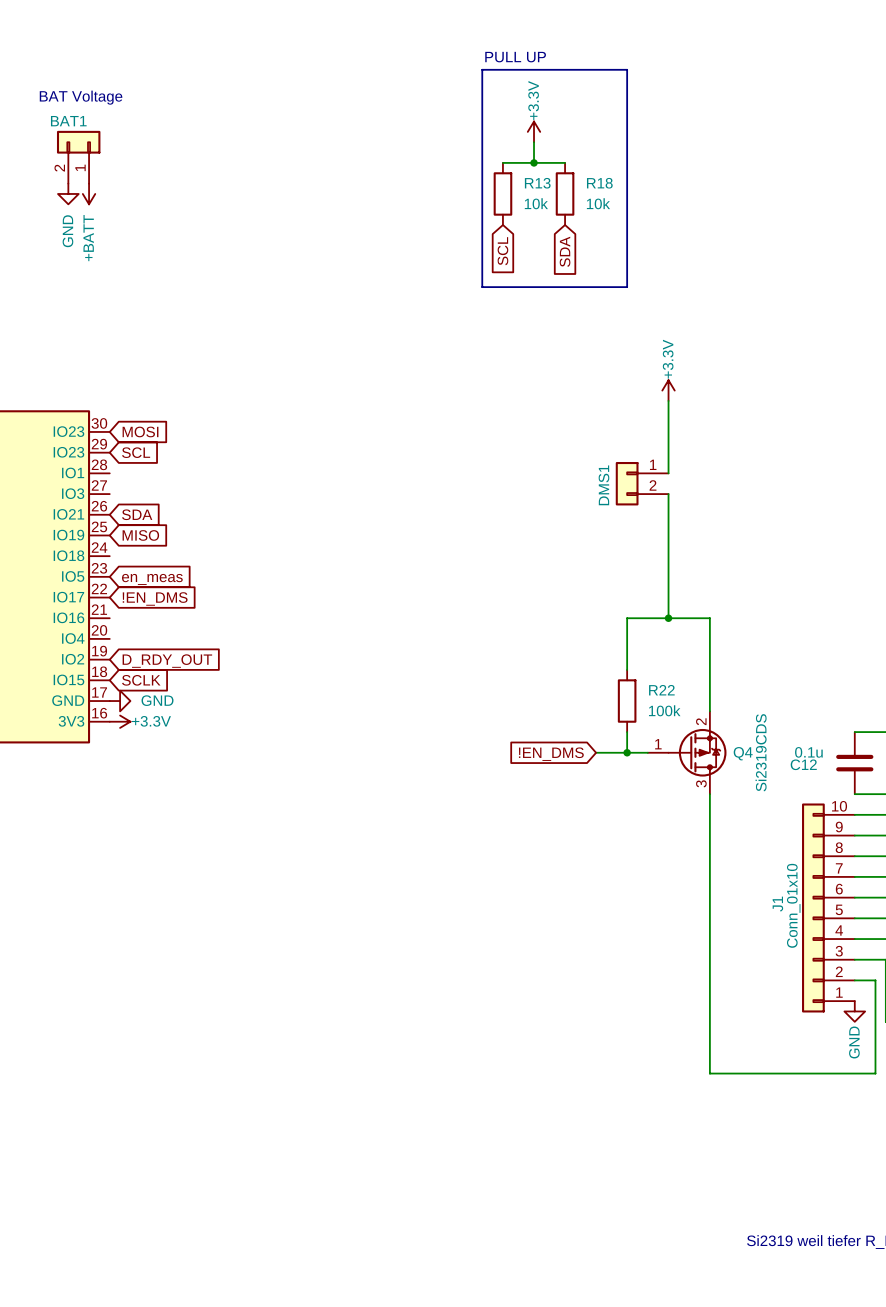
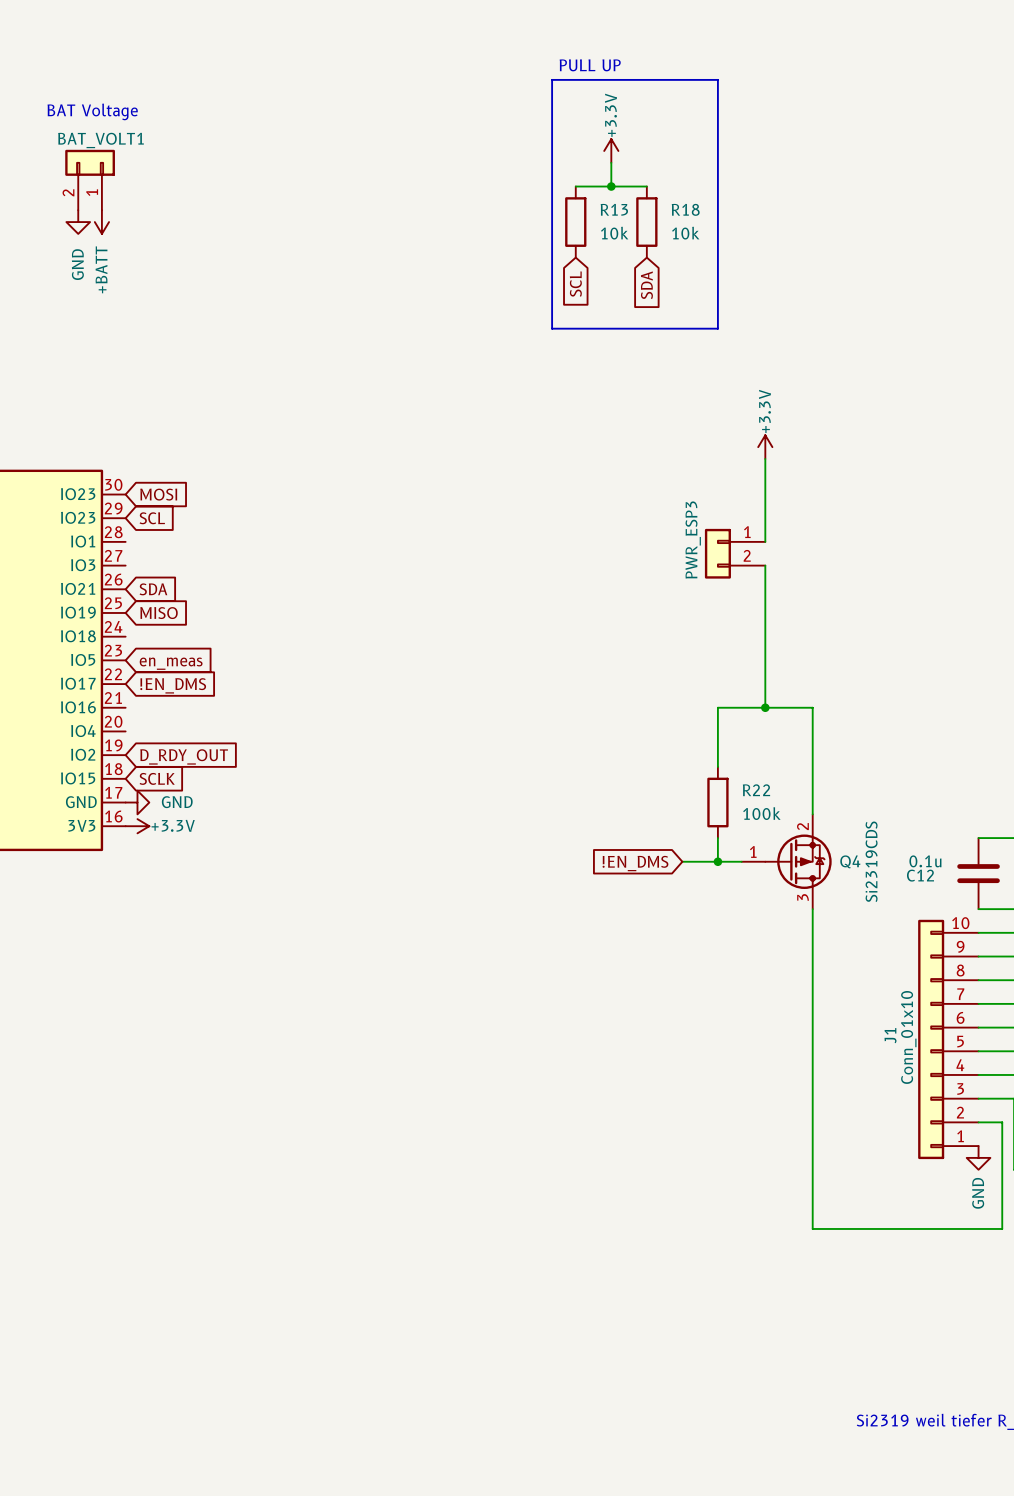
BAT1 name: BAT1 (68, 121) -> BAT_VOLT1 (100, 140)
DMS1 name: DMS1 (603, 485) -> PWR_ESP3 (693, 540)

